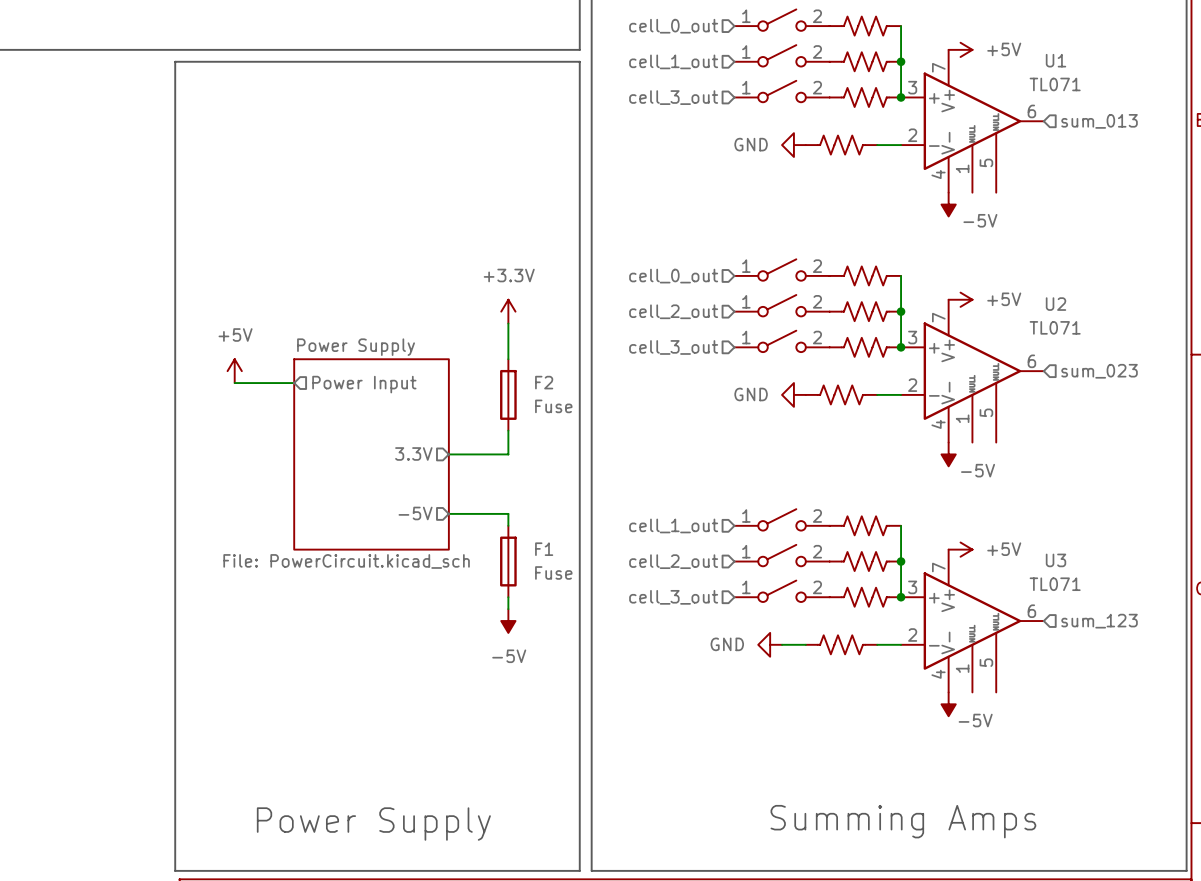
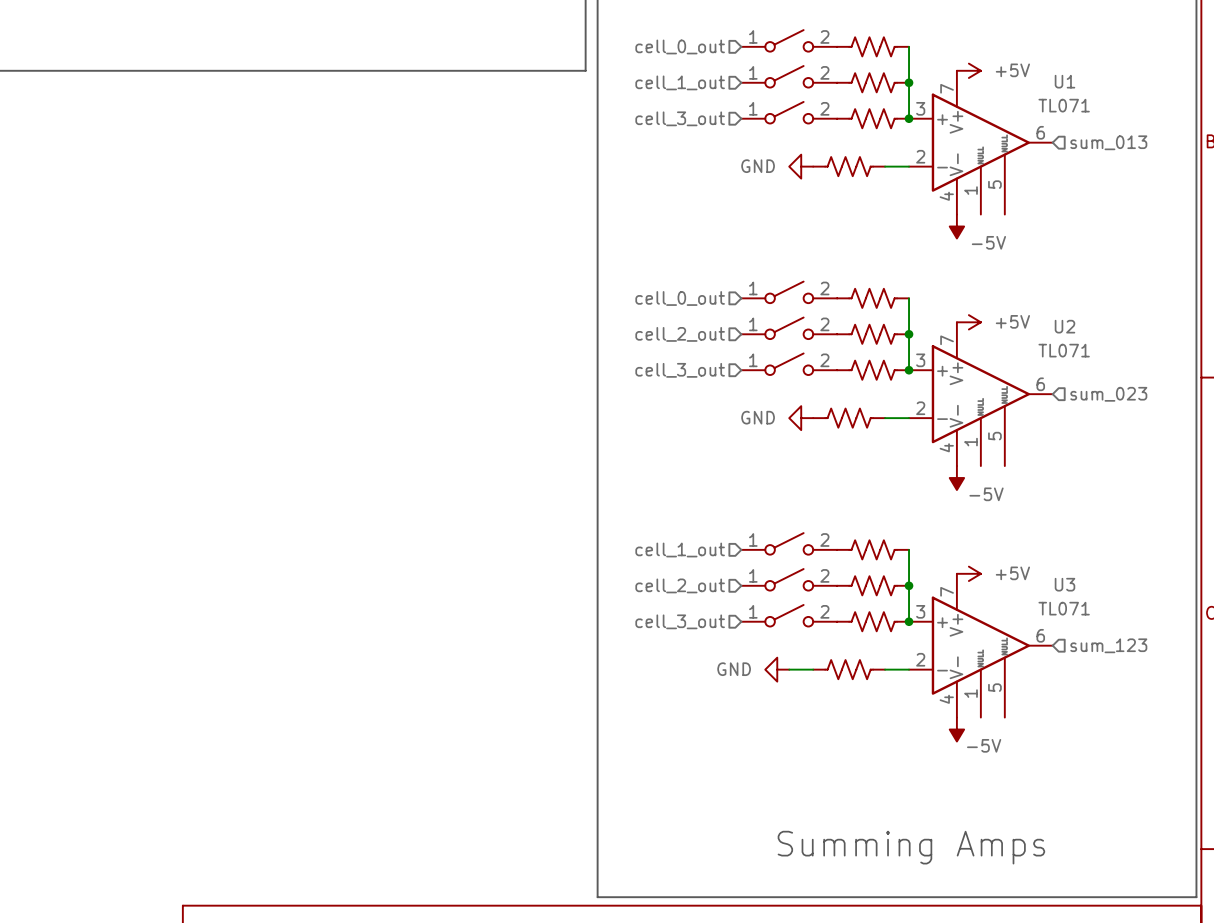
line: (175, 61) (579, 61) (579, 870) (175, 870) (175, 61) -> none
power symbol: +3.3V (508, 311) -> none
wire: (508, 323) (508, 359) -> none
power symbol: +5V (234, 371) -> none
wire: (234, 383) (294, 383) -> none
hierarchical label: Power Input (364, 384) -> none
F2: Fuse (508, 394) -> none
wire: (508, 430) (508, 454) (448, 454) -> none
sheet pin: 3.3V (413, 453) -> none
sheet Power Supply: File: PowerCircuit.kicad_sch (371, 454) -> none
sheet pin: -5V (415, 513) -> none
wire: (448, 513) (508, 513) (508, 525) -> none
F1: Fuse (508, 561) -> none
wire: (508, 597) (508, 609) -> none
power symbol: -5V (508, 621) -> none
text: Power Supply (373, 824) -> none

